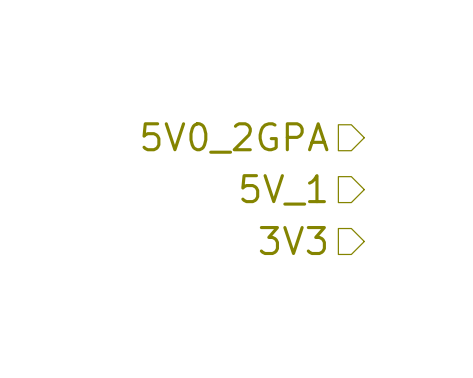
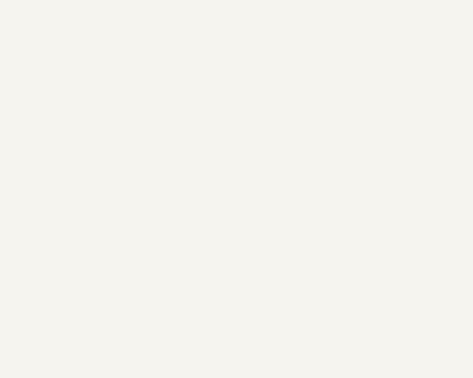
hierarchical label: 5V0_2GPA (235, 138) -> none
hierarchical label: 5V_1 (283, 189) -> none
hierarchical label: 3V3 (292, 240) -> none

